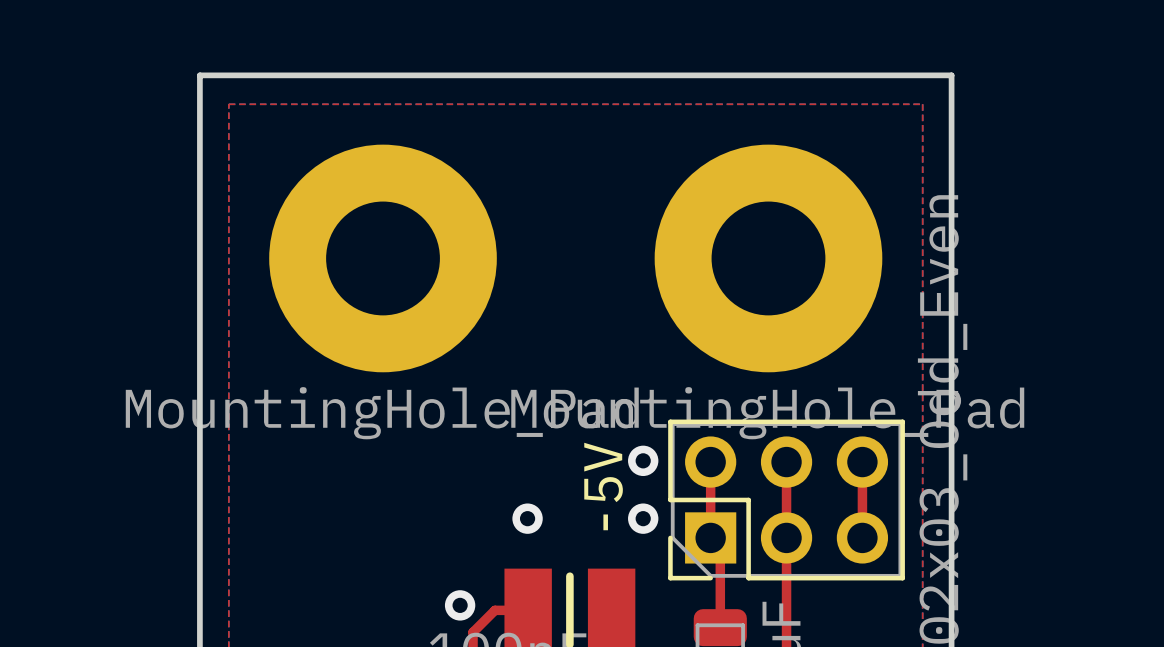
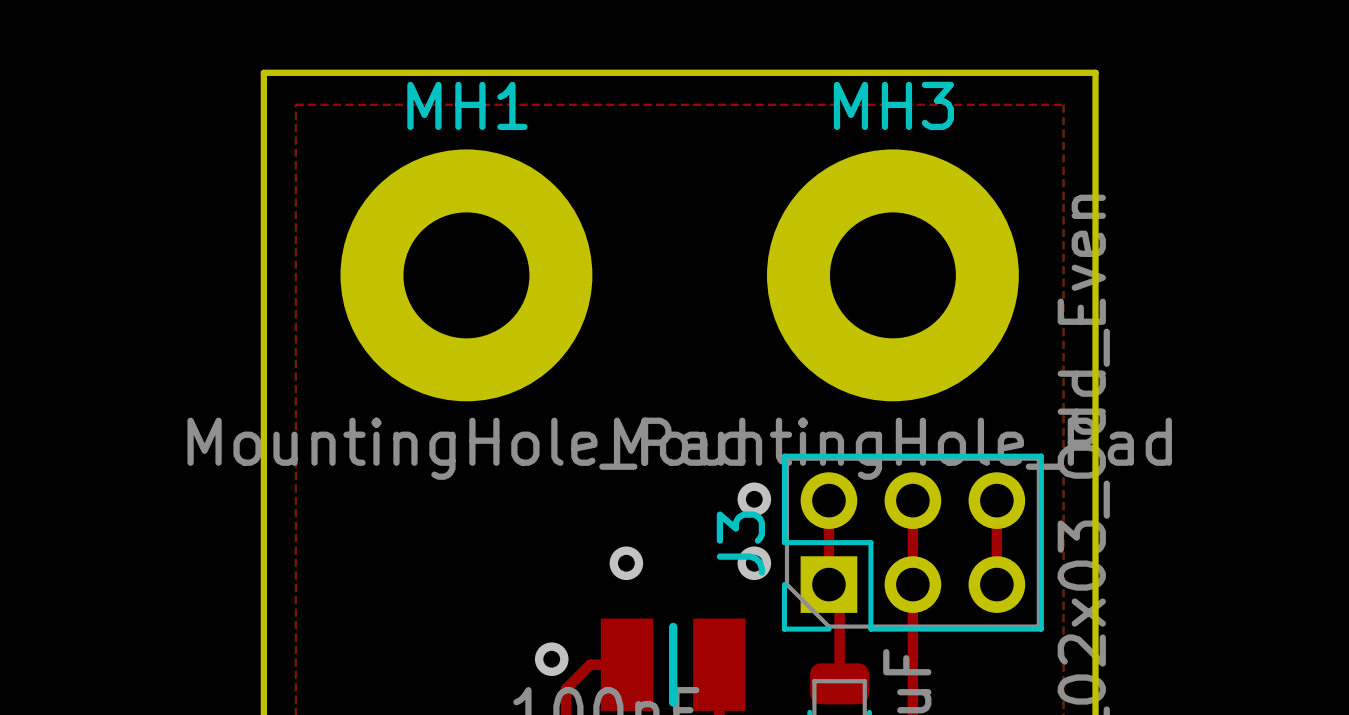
MH1 name: none -> MH1 (467, 105)
MH3 name: none -> MH3 (893, 105)
-5V name: -5V (603, 486) -> J3 (740, 543)

